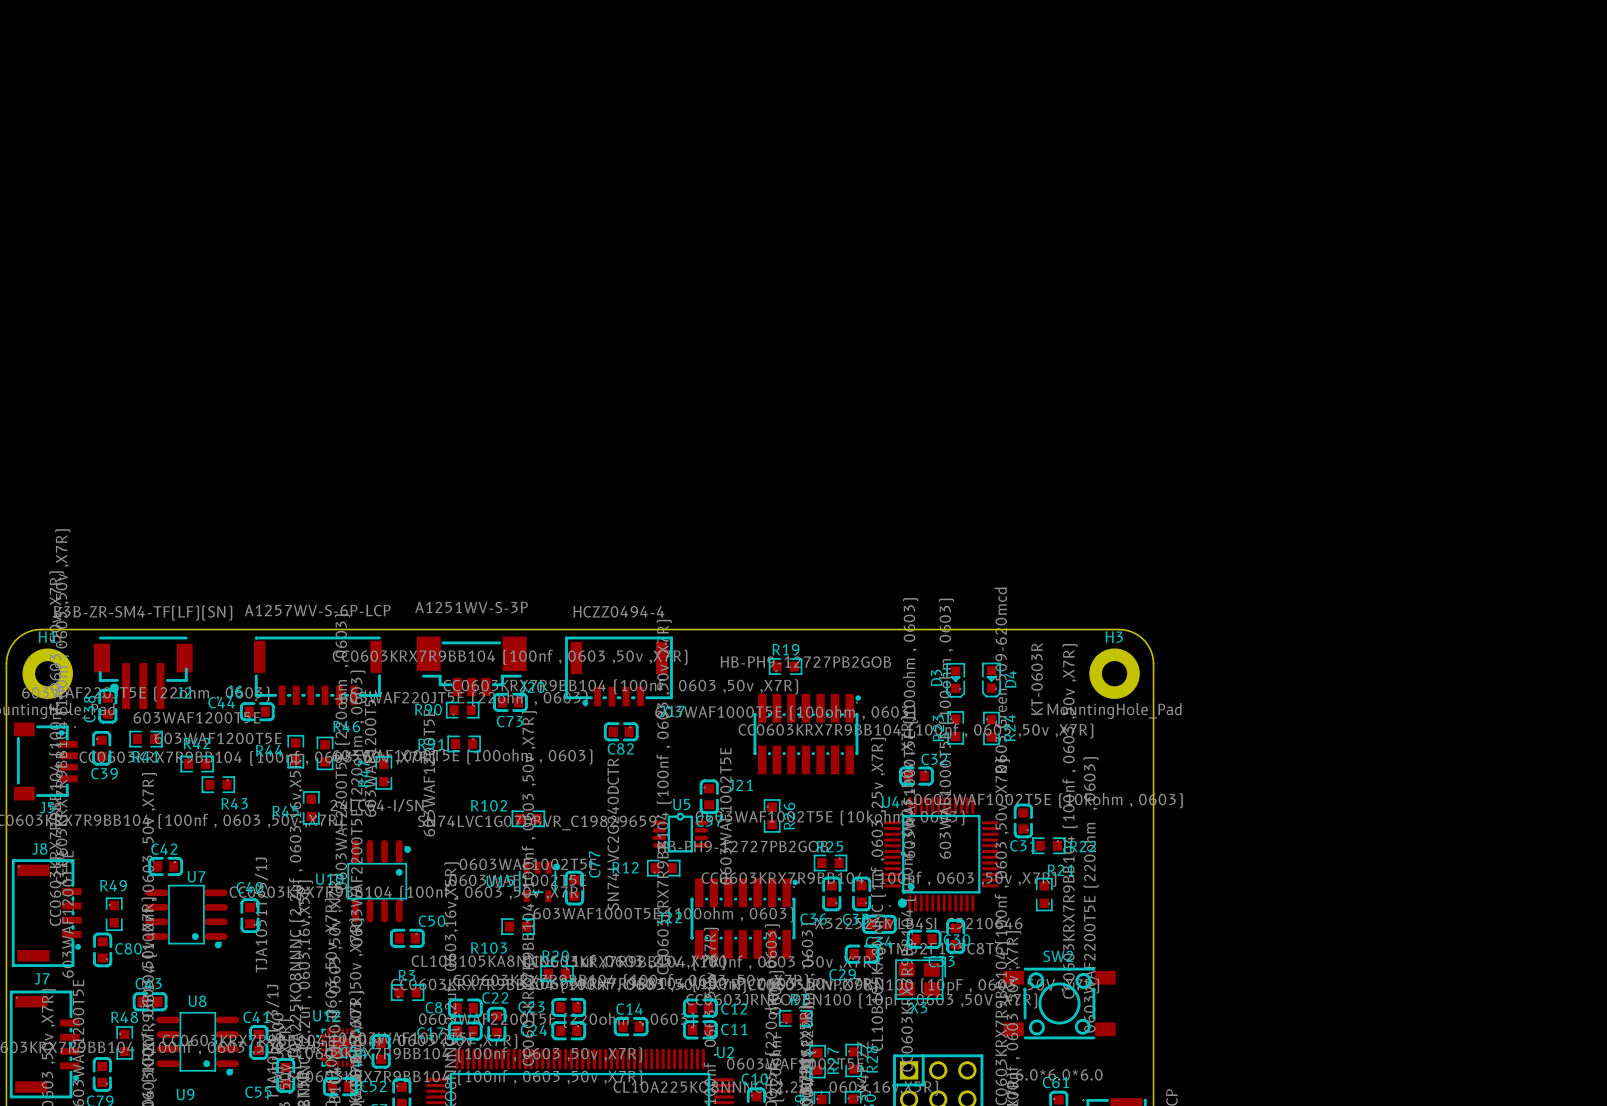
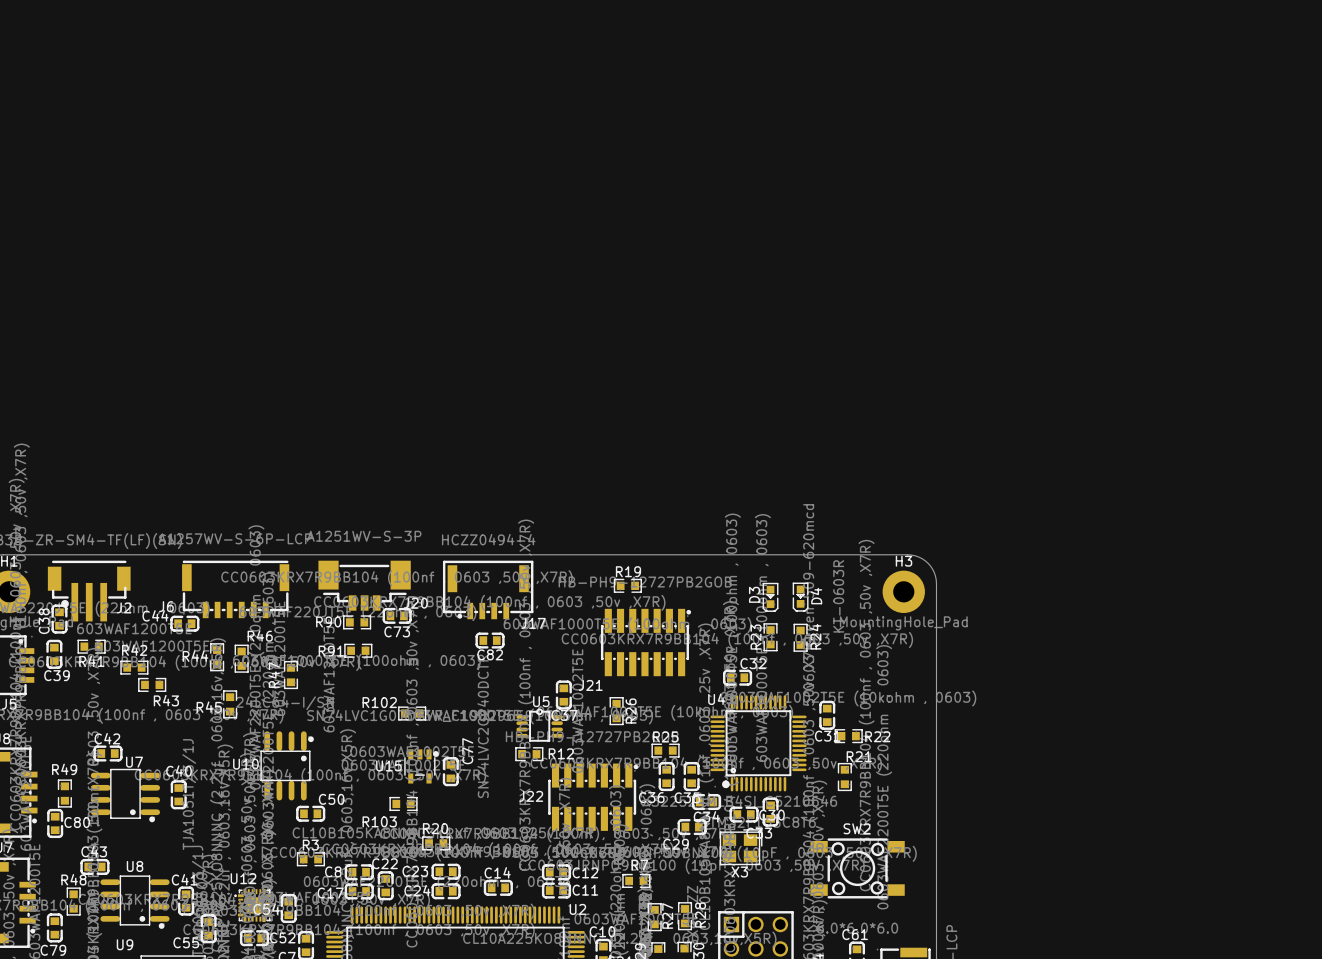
R12 rotation: 0° (663, 868) -> 180° (529, 754)

